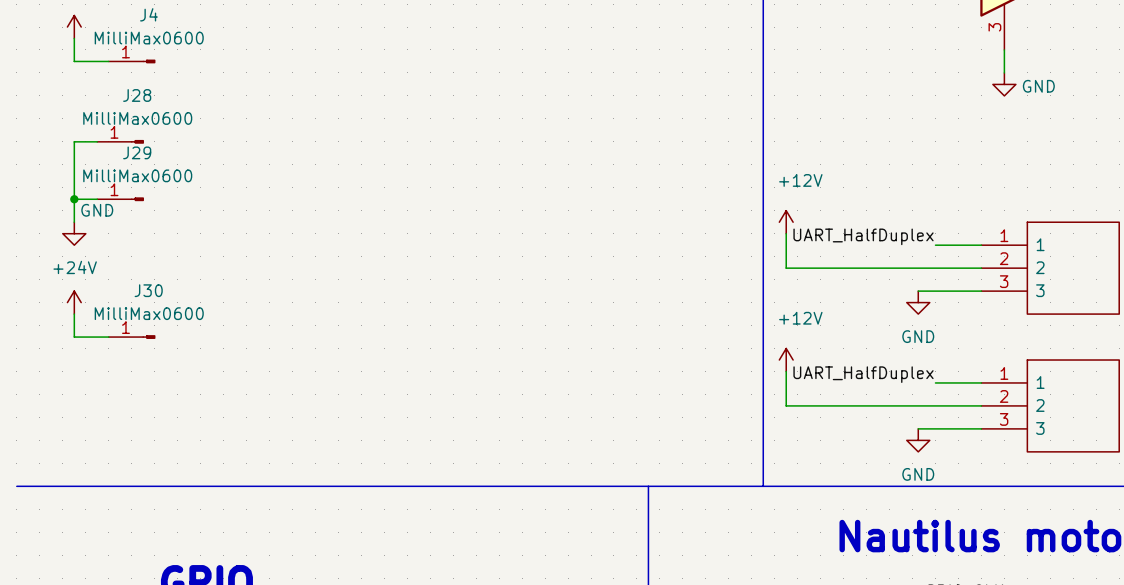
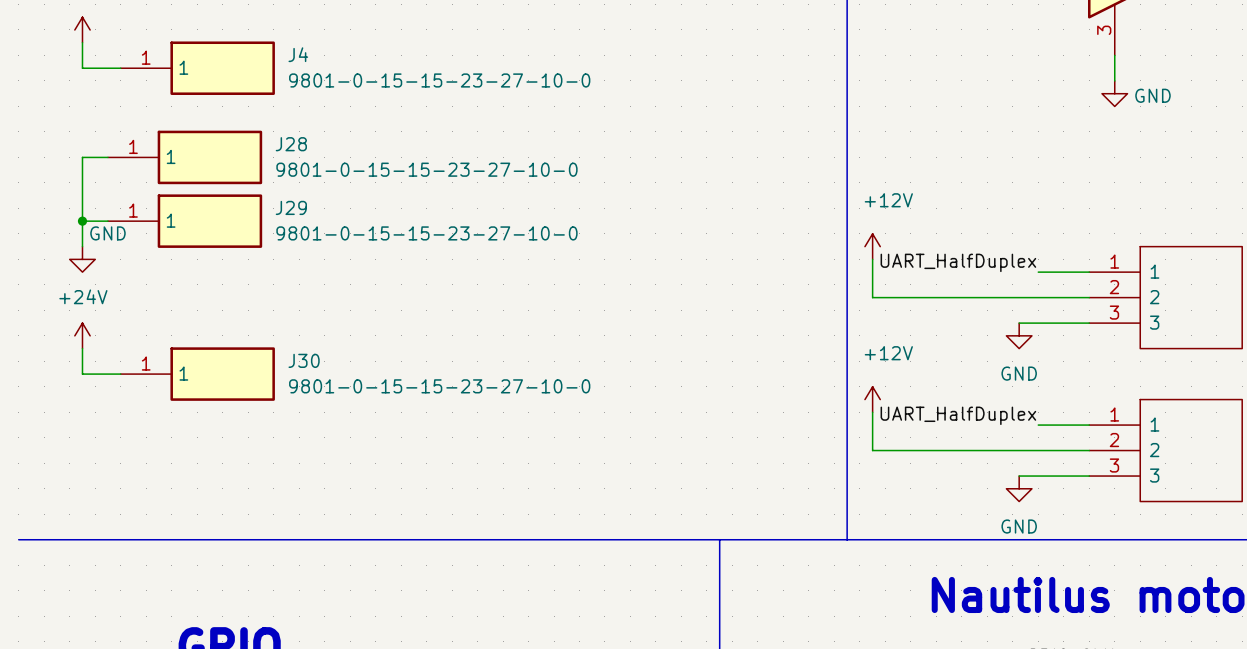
J4 name position: J4 (148, 14) -> J4 (298, 54)
J4 value: MilliMax0600 (149, 38) -> 9801-0-15-15-23-27-10-0 (439, 80)
J4 symbol: [108, 59, 156, 64] -> [120, 41, 275, 95]
J28 name position: J28 (137, 95) -> J28 (291, 144)
J28 value: MilliMax0600 (137, 118) -> 9801-0-15-15-23-27-10-0 (426, 169)
J28 symbol: [97, 140, 144, 144] -> [107, 130, 263, 185]
J29 name position: J29 (137, 152) -> J29 (291, 207)
J29 value: MilliMax0600 (137, 175) -> 9801-0-15-15-23-27-10-0 (426, 233)
J29 symbol: [97, 197, 144, 202] -> [107, 194, 263, 248]
J30 name position: J30 (148, 290) -> J30 (304, 360)
J30 value: MilliMax0600 (149, 313) -> 9801-0-15-15-23-27-10-0 (439, 386)
J30 symbol: [108, 335, 156, 339] -> [120, 347, 275, 401]

